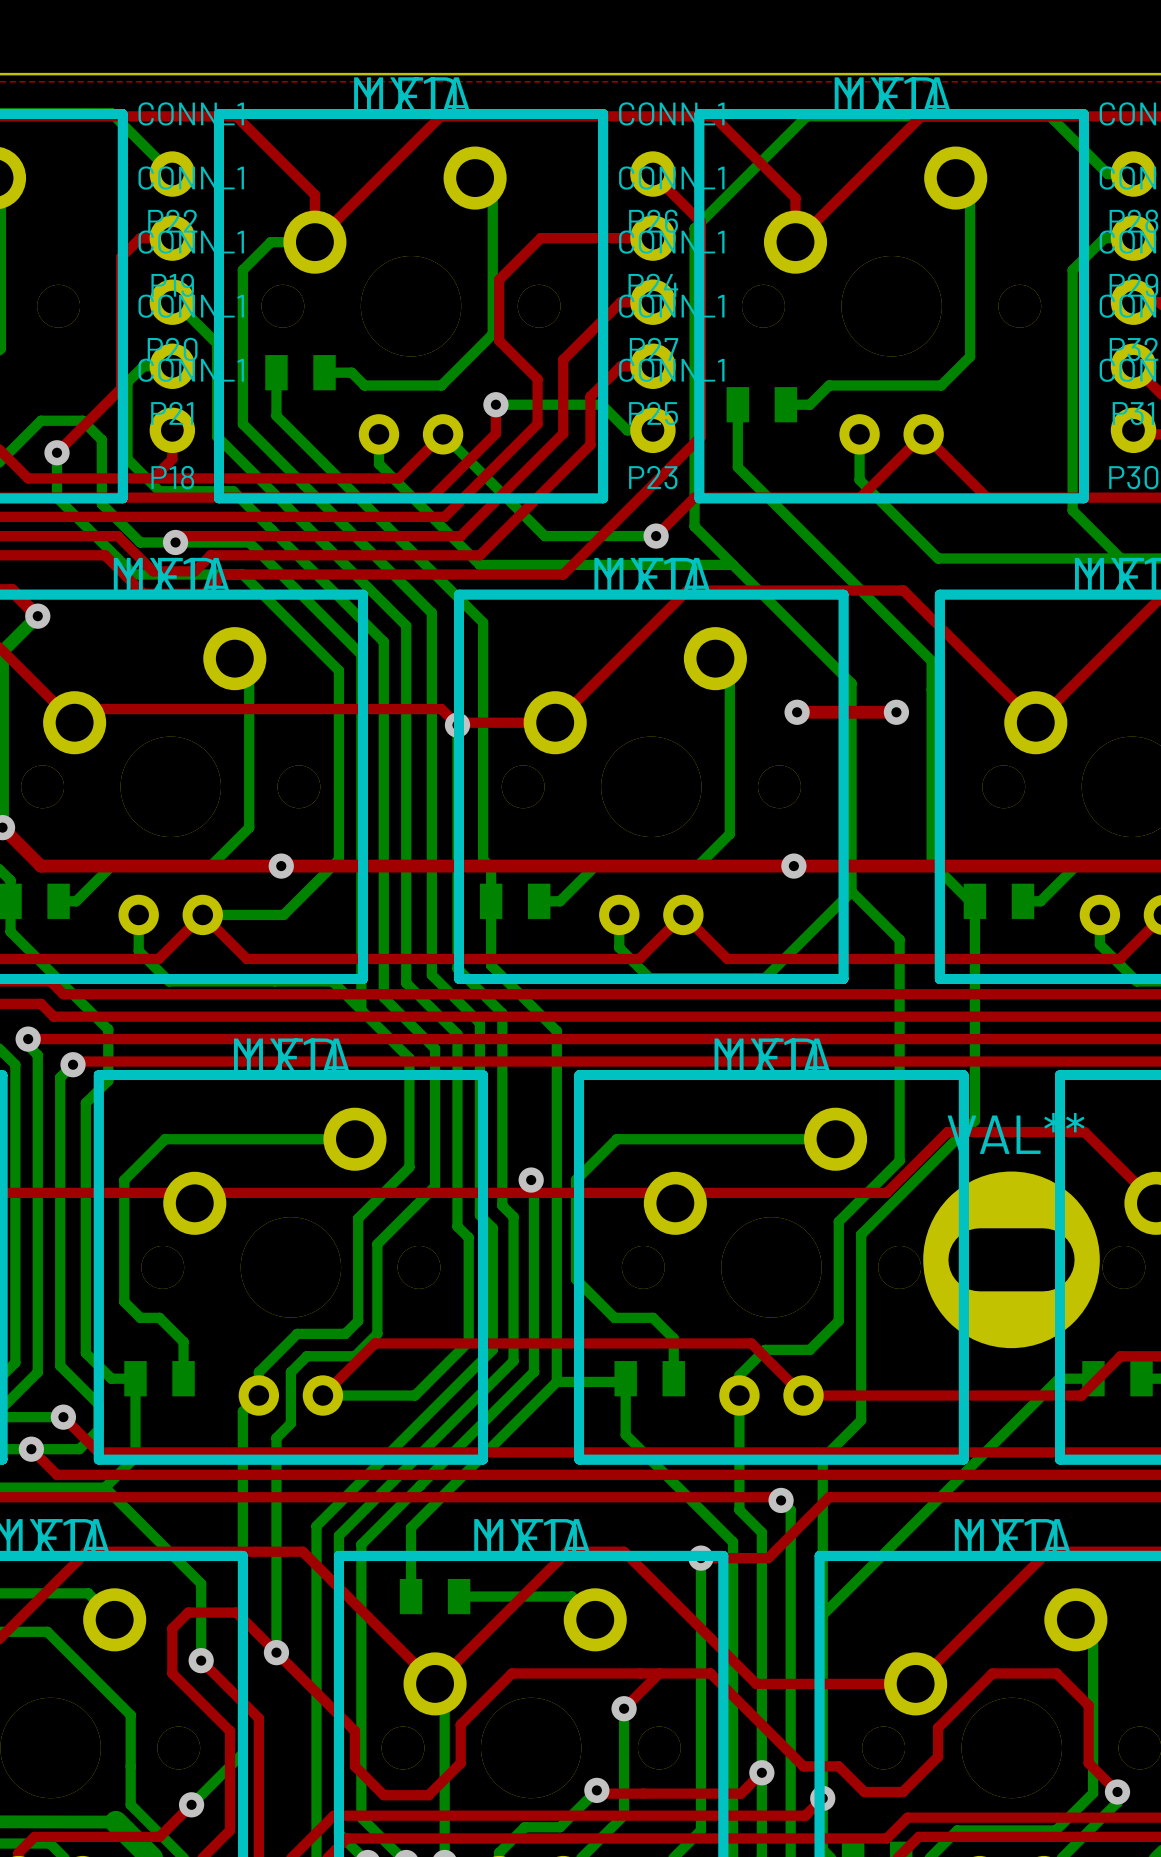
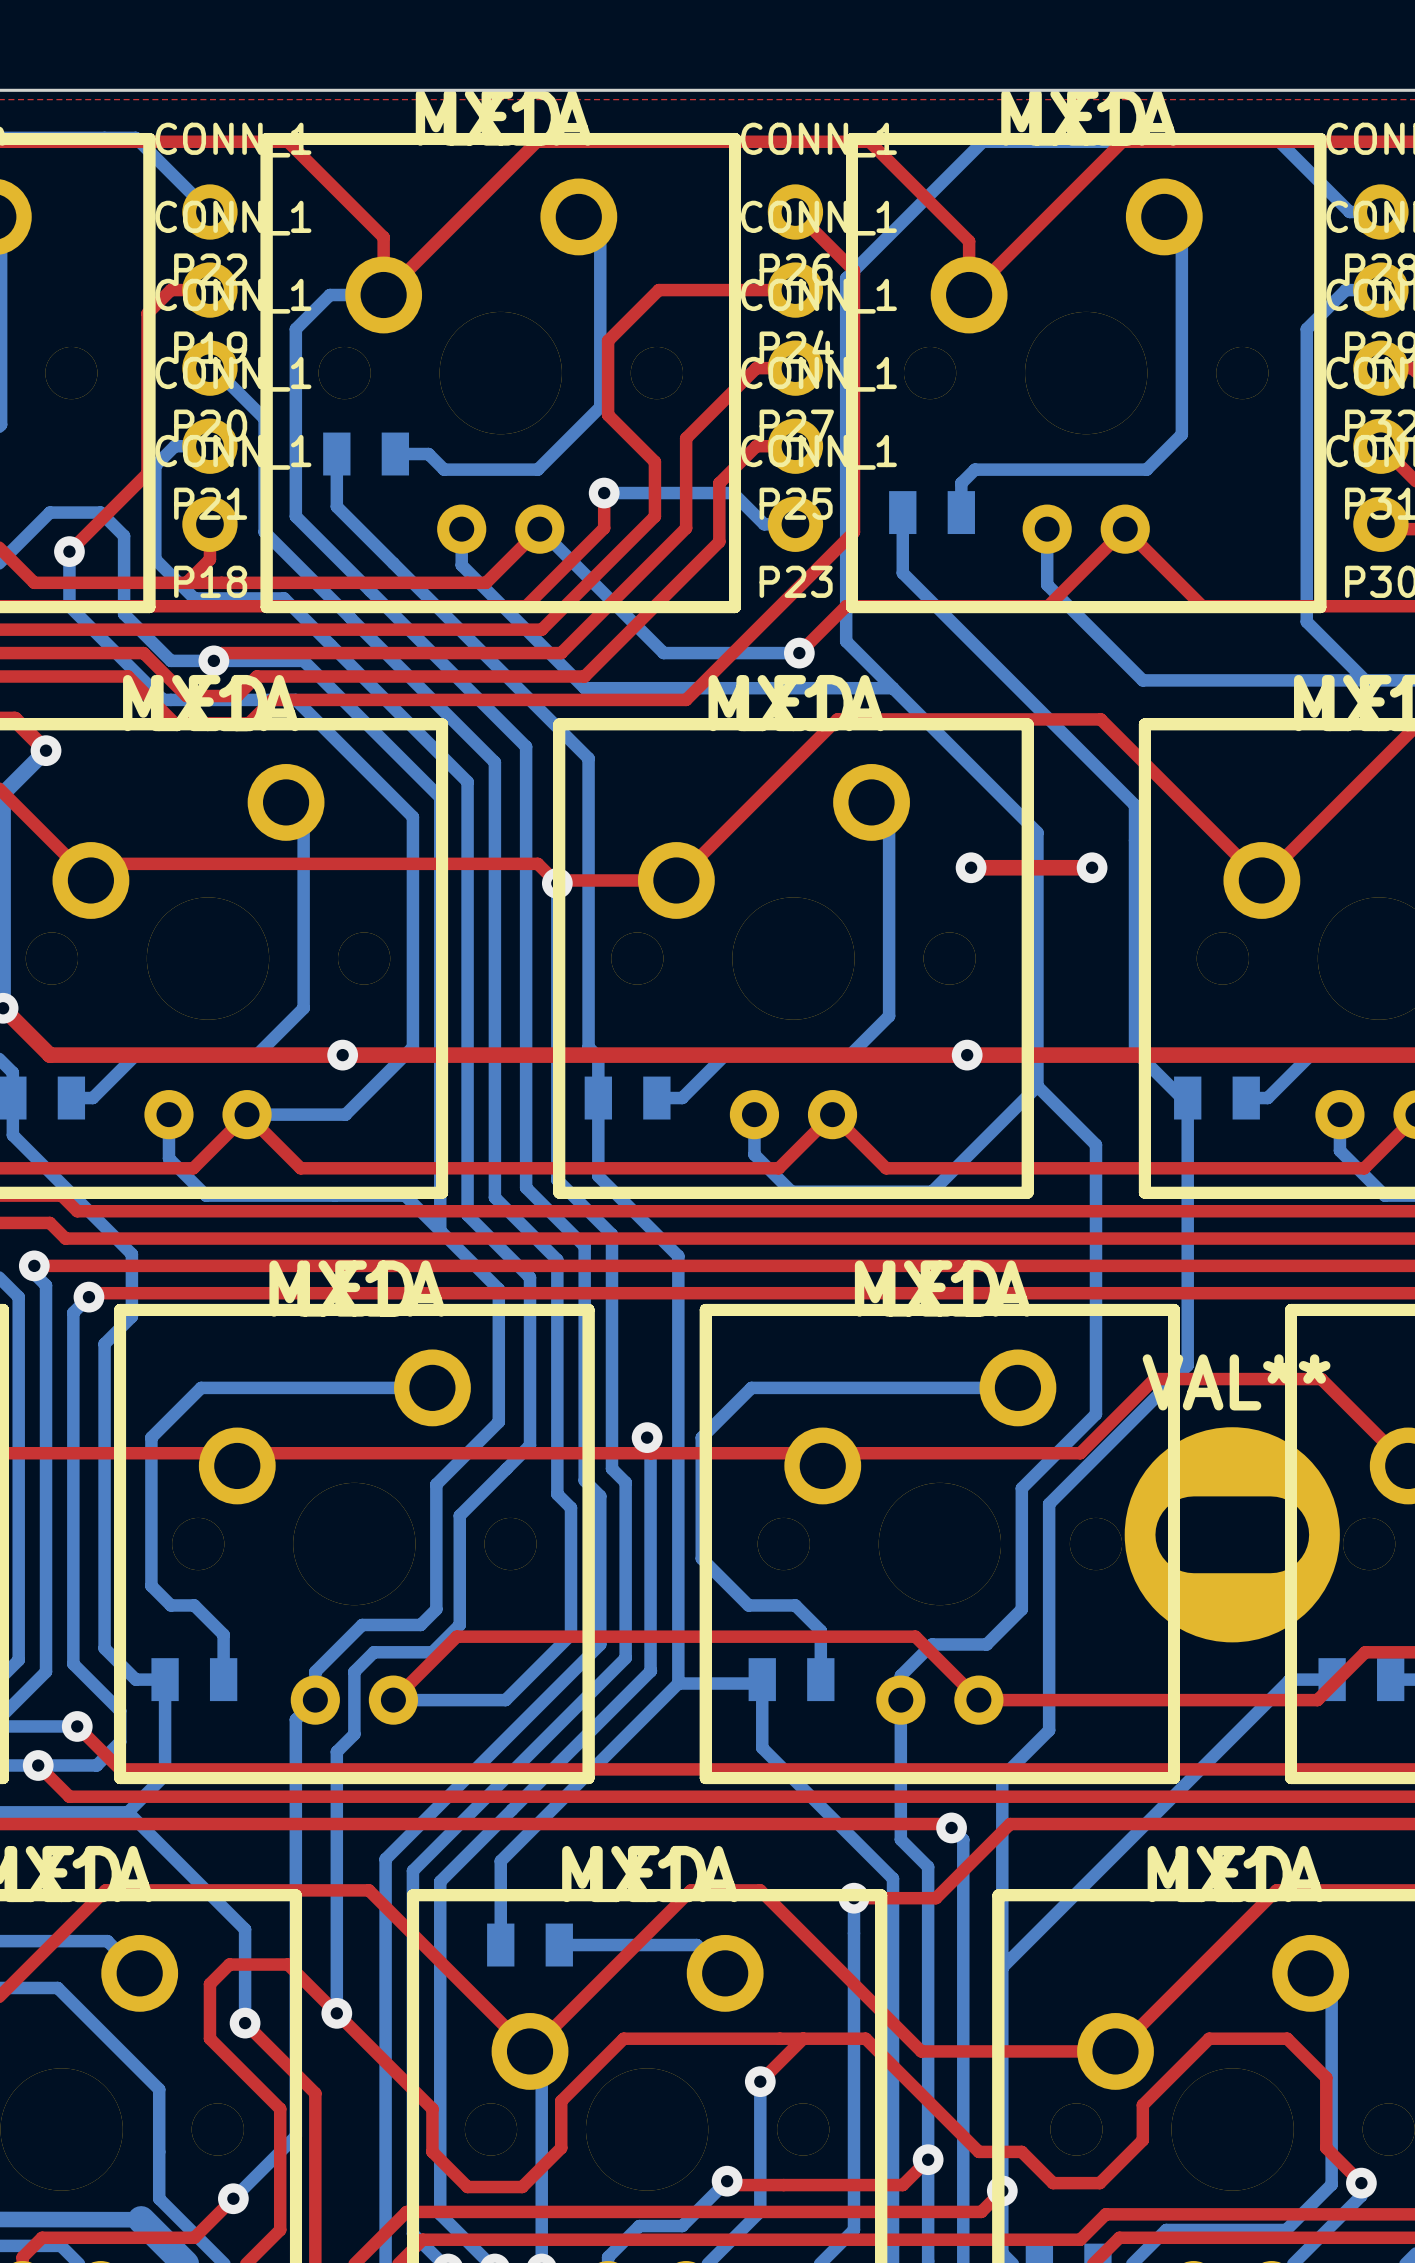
bottom track: (829, 385) (809, 404) (785, 404) -> (1010, 469) (974, 469) (961, 483) (961, 512)
bottom track: (737, 404) (737, 467) (741, 470) -> (902, 512) (902, 573)
part position: (761, 404) -> (932, 512)

